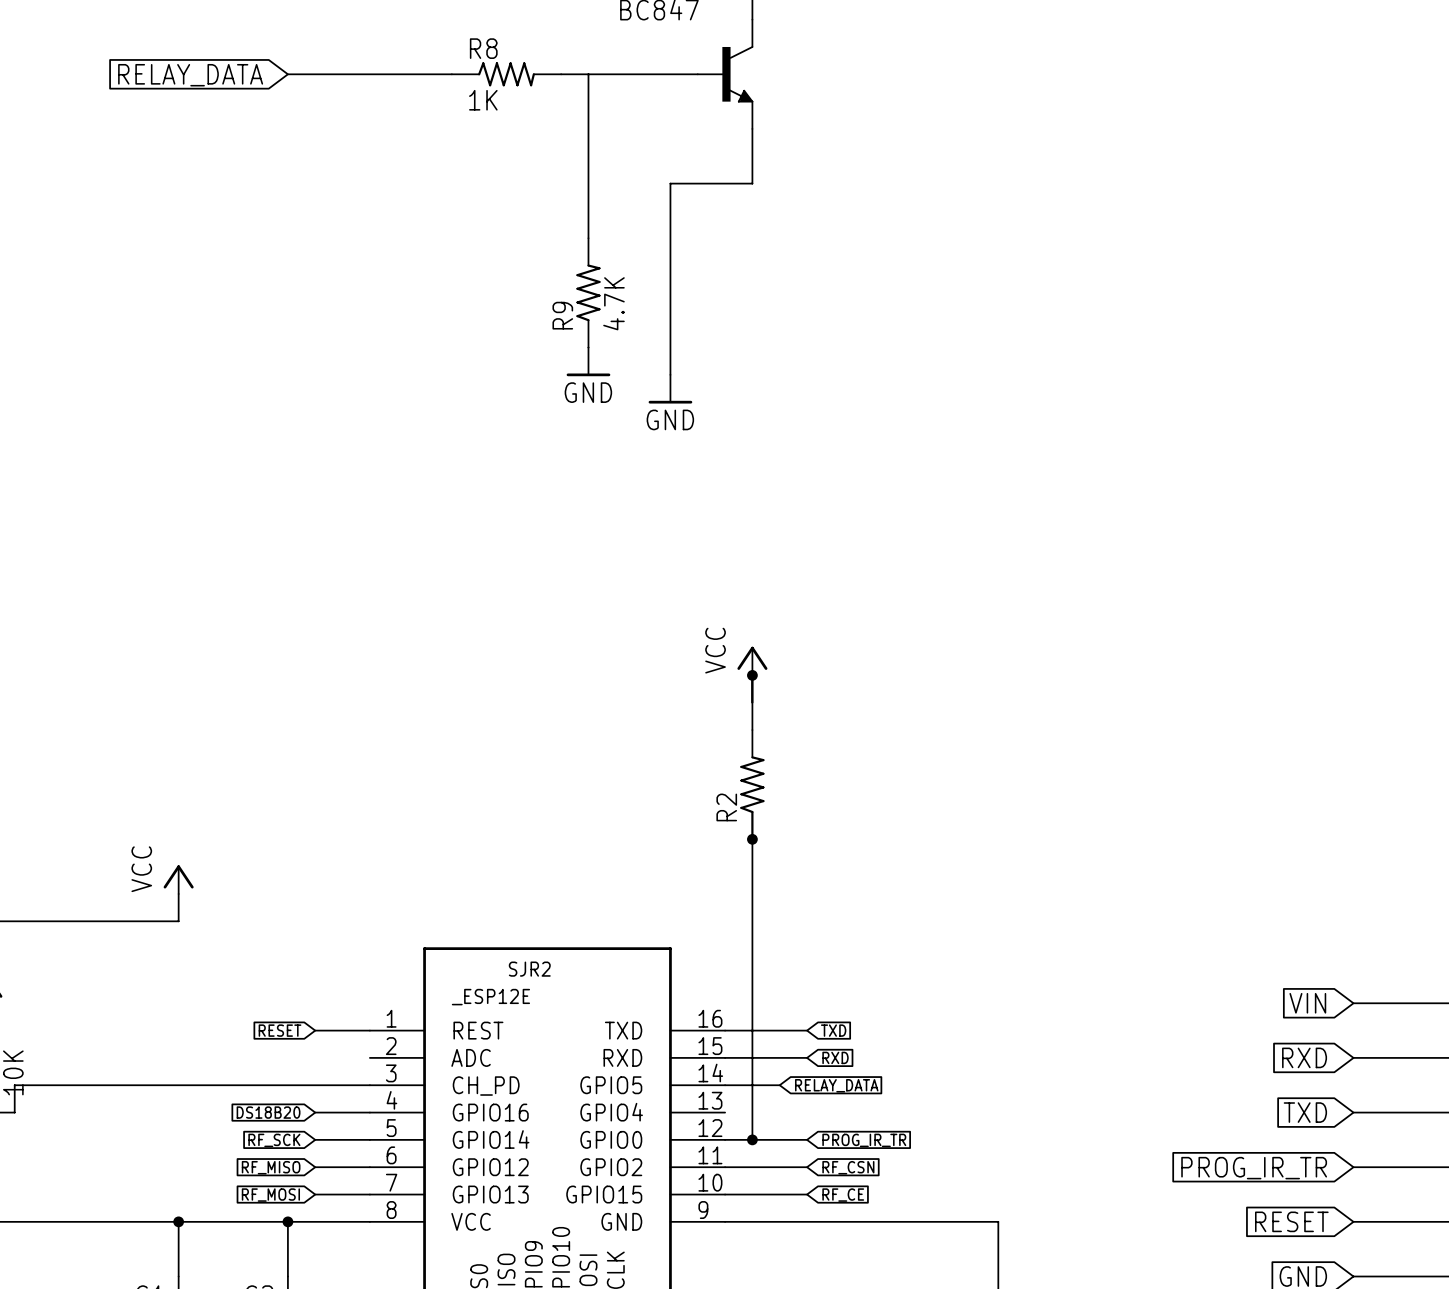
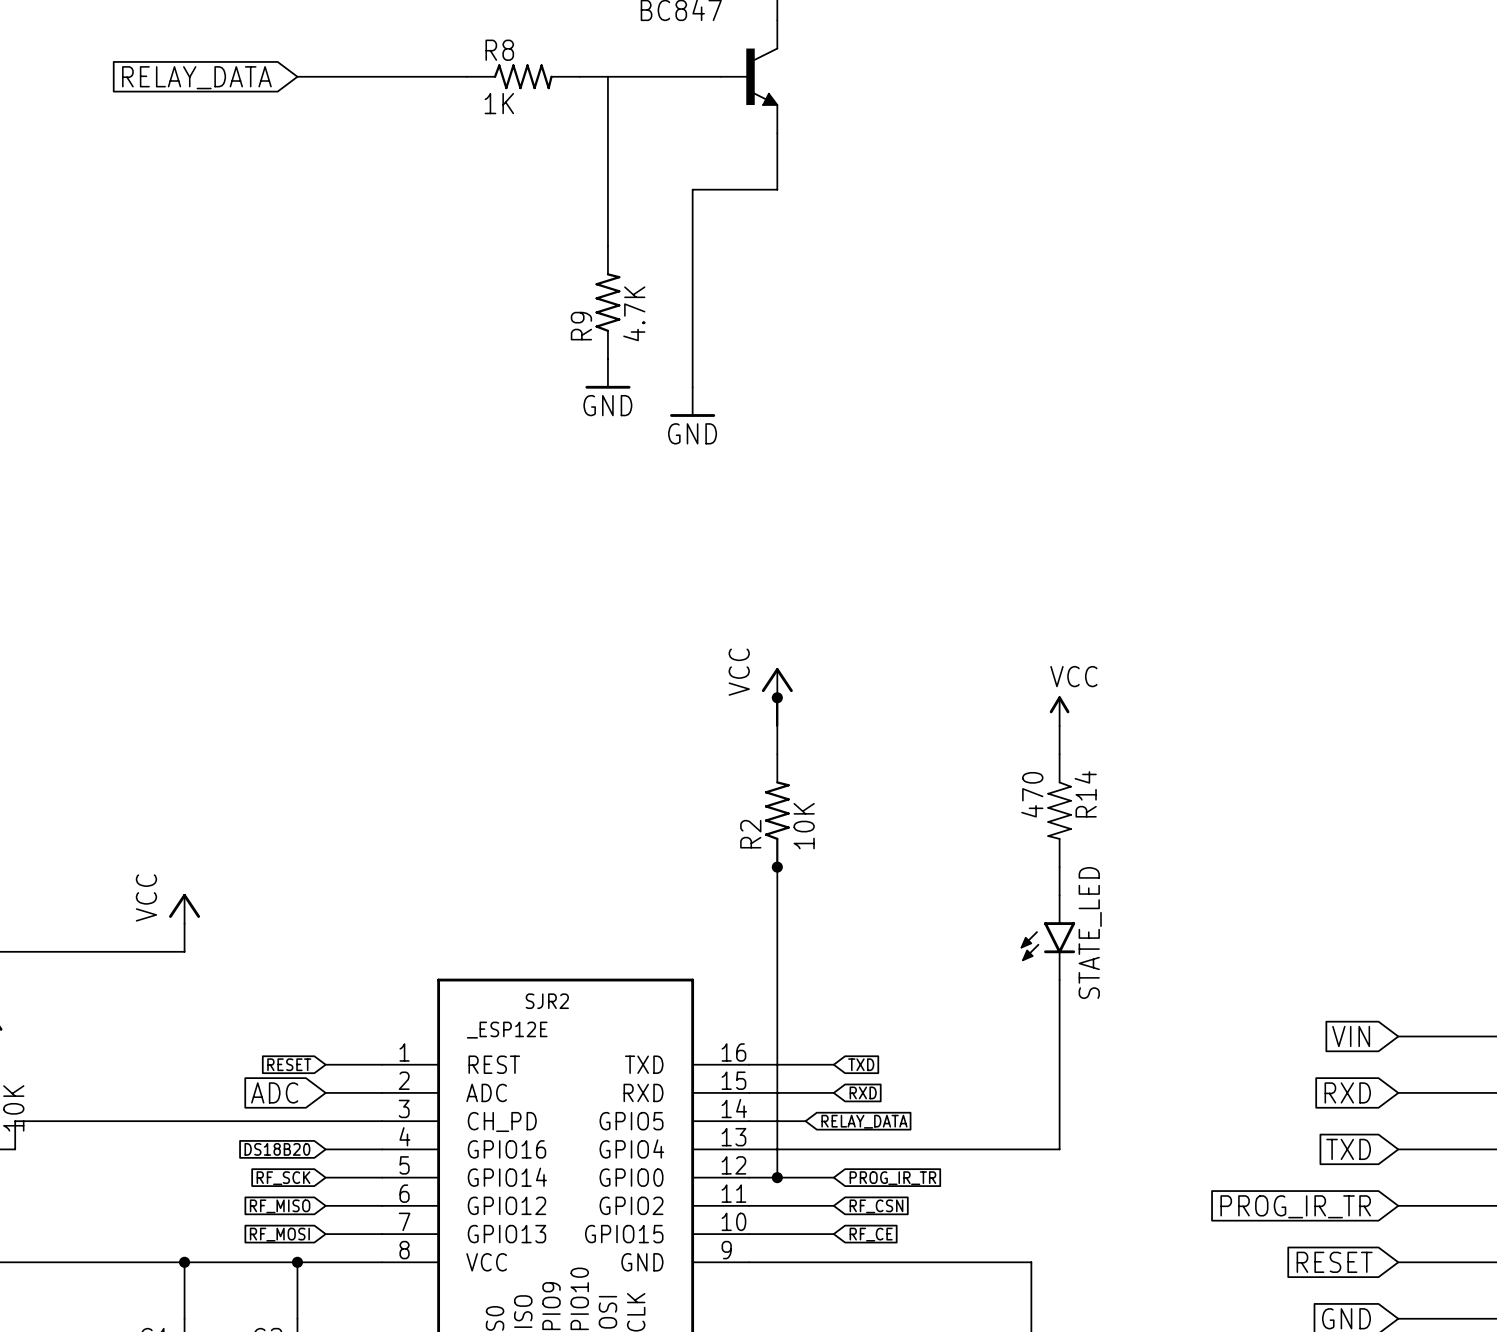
power symbol: none -> VCC (1059, 711)
wire: none -> (1059, 725) (1059, 754)
R14: none -> 470 (1059, 810)
R2 value: none -> 10K (804, 826)
wire: none -> (1059, 867) (1059, 895)
STATE_LED: none -> (1047, 937)
wire: none -> (1059, 980) (1059, 1149) (749, 1149)
global label: none -> ADC (274, 1092)
wire: none -> (325, 1092) (382, 1092)

